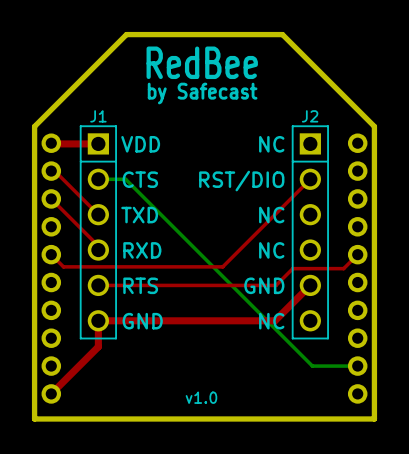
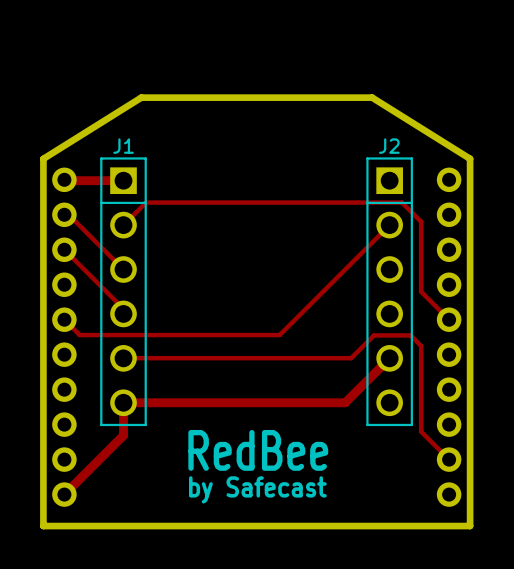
text position: RedBee (202, 62) -> RedBee (258, 450)
text position: by Safecast (202, 93) -> by Safecast (257, 489)
board edge: (34, 126) (126, 34) (282, 34) (374, 126) -> (43, 158) (141, 97) (372, 97) (470, 158)
text: VDD (140, 144) -> none
text: NC (271, 144) -> none
bottom track: (98, 179) (125, 179) (312, 366) (357, 366) -> none
text: CTS (140, 179) -> none
text: RST/DIO (241, 181) -> none
text: TXD (139, 215) -> none
text: NC (271, 215) -> none
text: RXD (142, 250) -> none
text: NC (271, 250) -> none
top track: (357, 254) (343, 268) (292, 268) (276, 285) (98, 285) -> (449, 319) (421, 291) (421, 221) (401, 202) (146, 202) (123, 225)
top track: none -> (123, 358) (351, 358) (373, 335) (410, 335) (421, 345) (421, 431) (449, 459)
text: RTS (140, 285) -> none
text: GND (264, 285) -> none
text: GND (142, 321) -> none
text: NC (271, 321) -> none
text: v1.0 (201, 397) -> none

